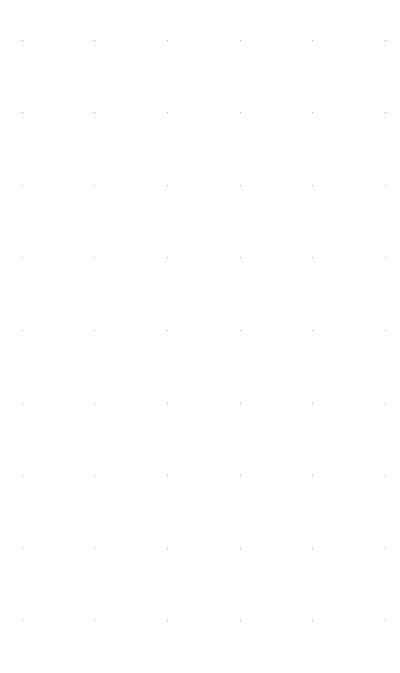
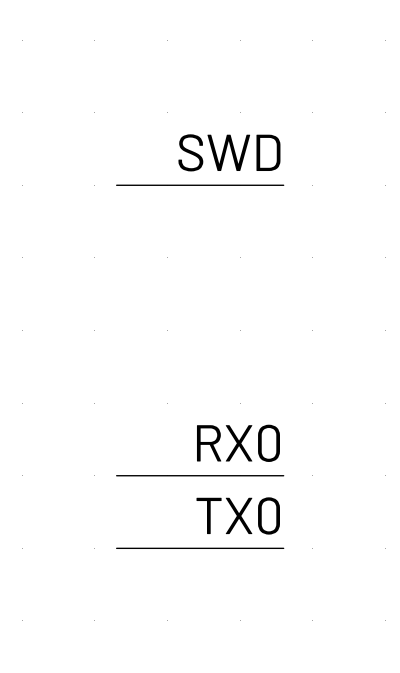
label: none -> SWD (229, 152)
wire: none -> (116, 185) (283, 185)
label: none -> RX0 (238, 443)
wire: none -> (116, 475) (283, 475)
label: none -> TX0 (238, 515)
wire: none -> (116, 548) (283, 548)

